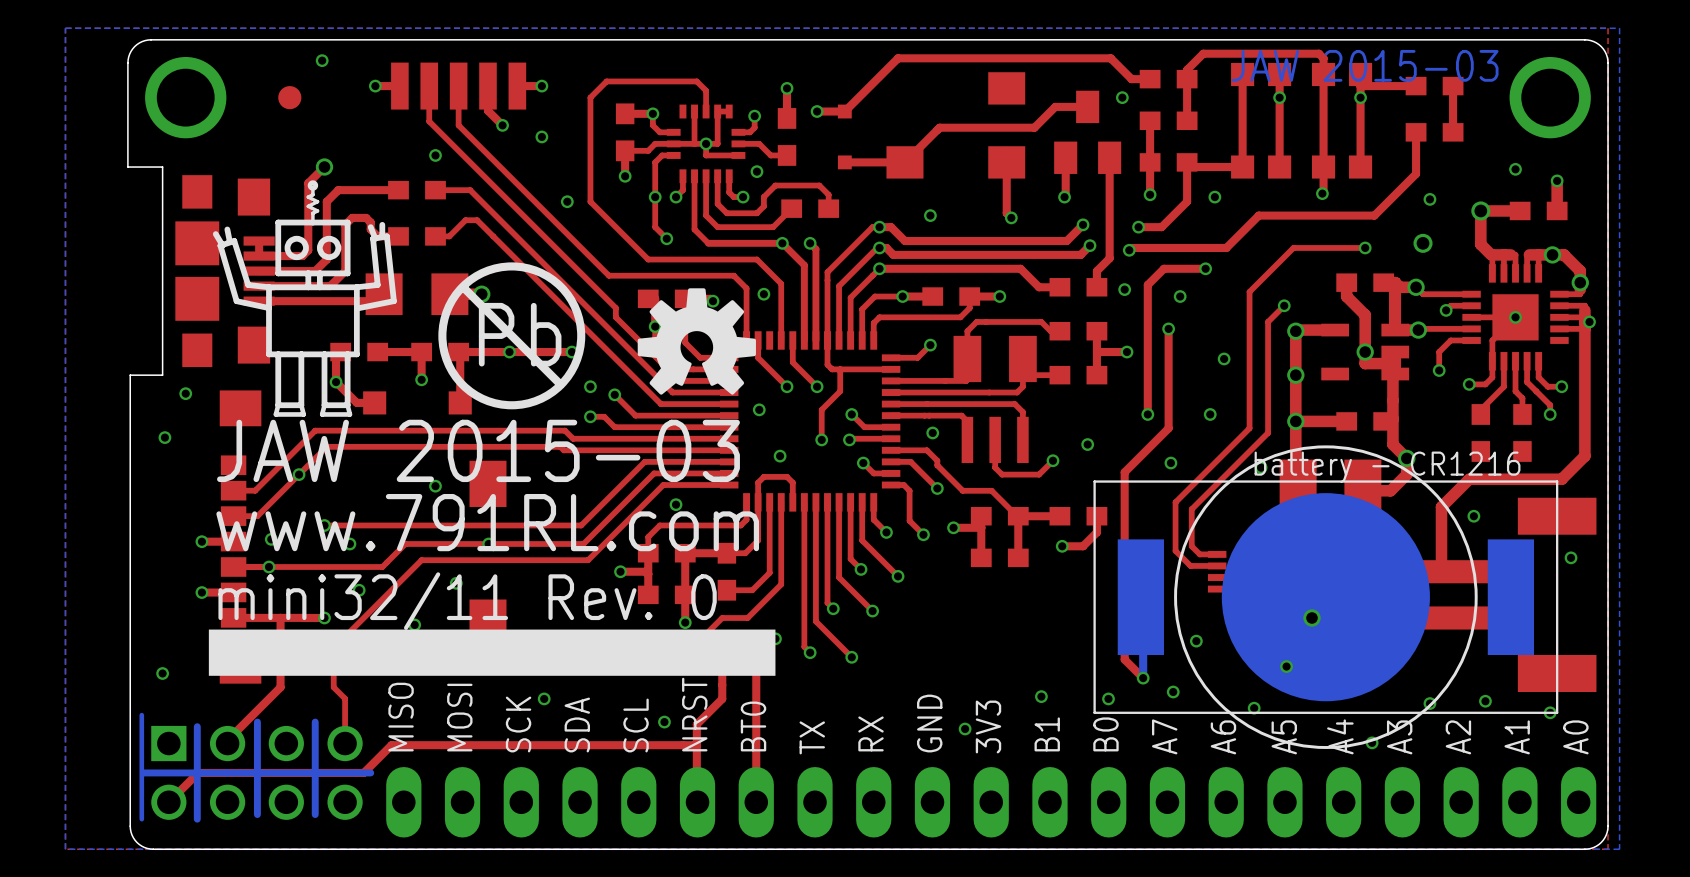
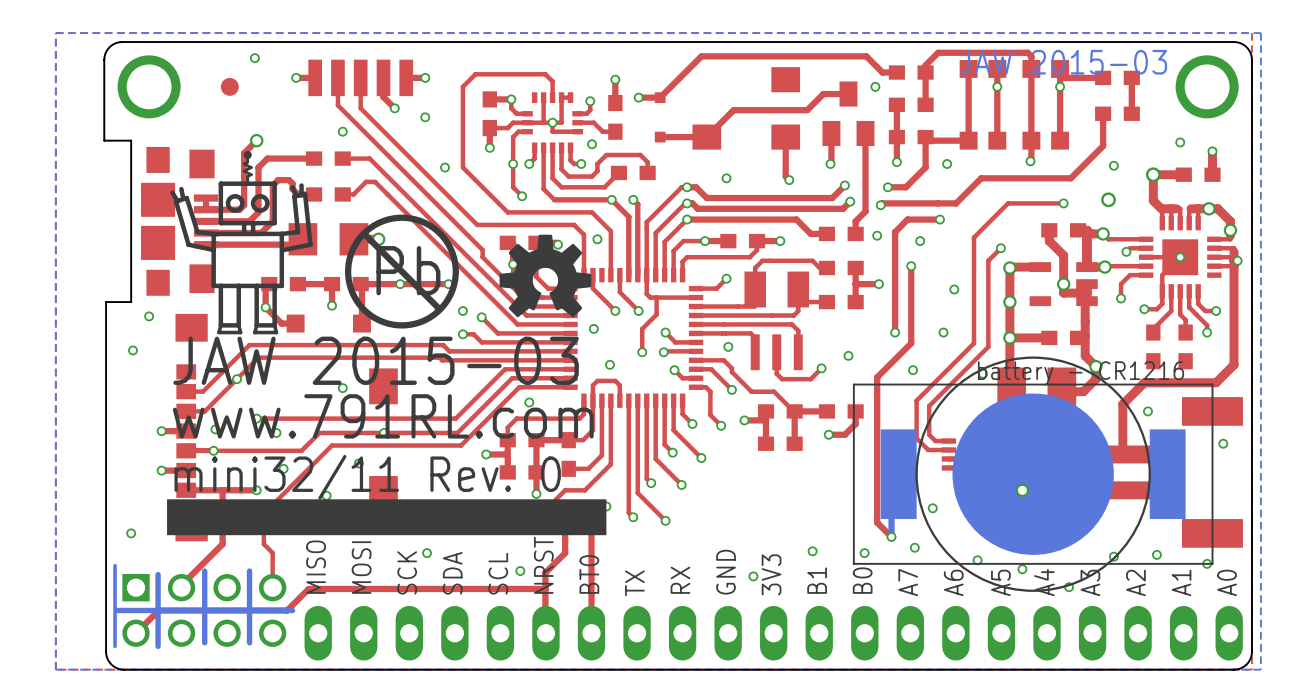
part footprint: [1093, 445, 1559, 749] -> [852, 356, 1214, 592]
via position: (1286, 666) -> (1022, 569)

